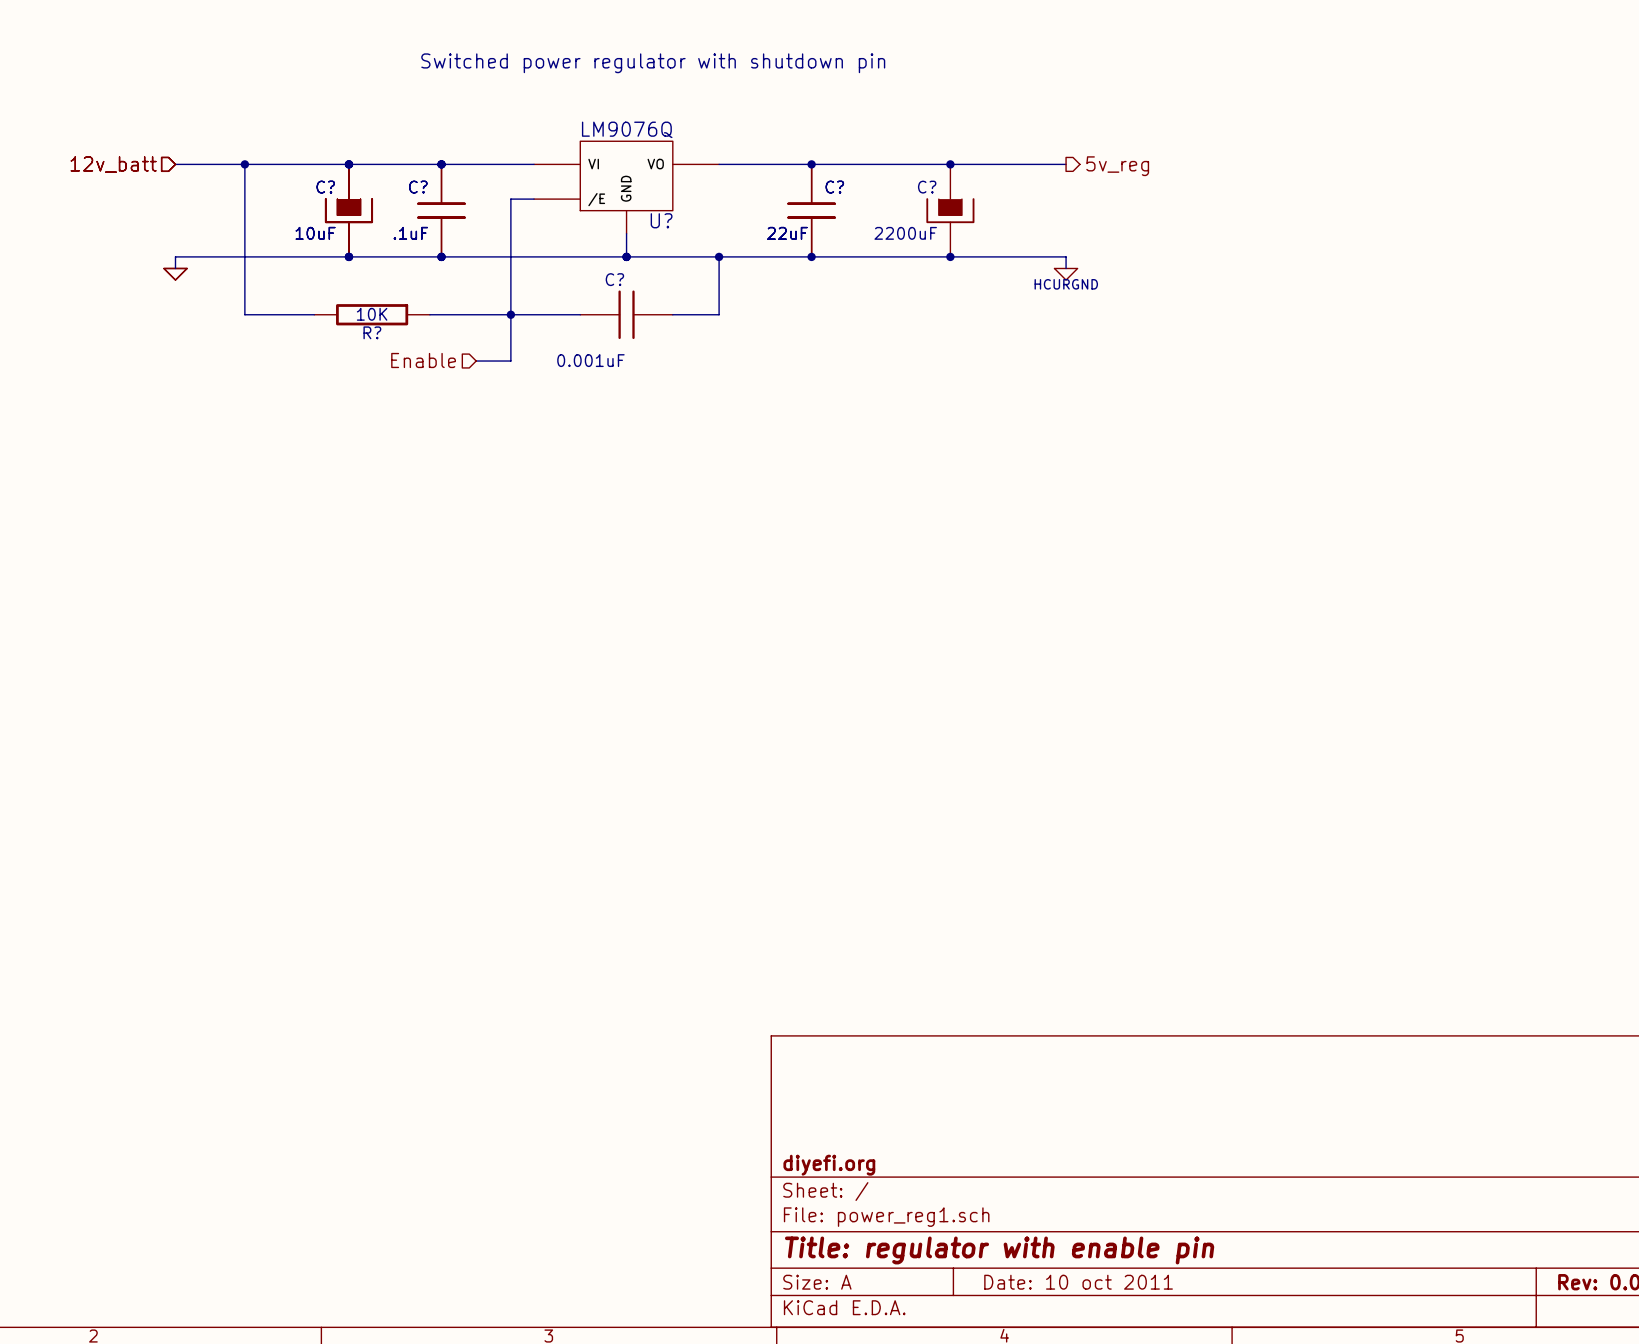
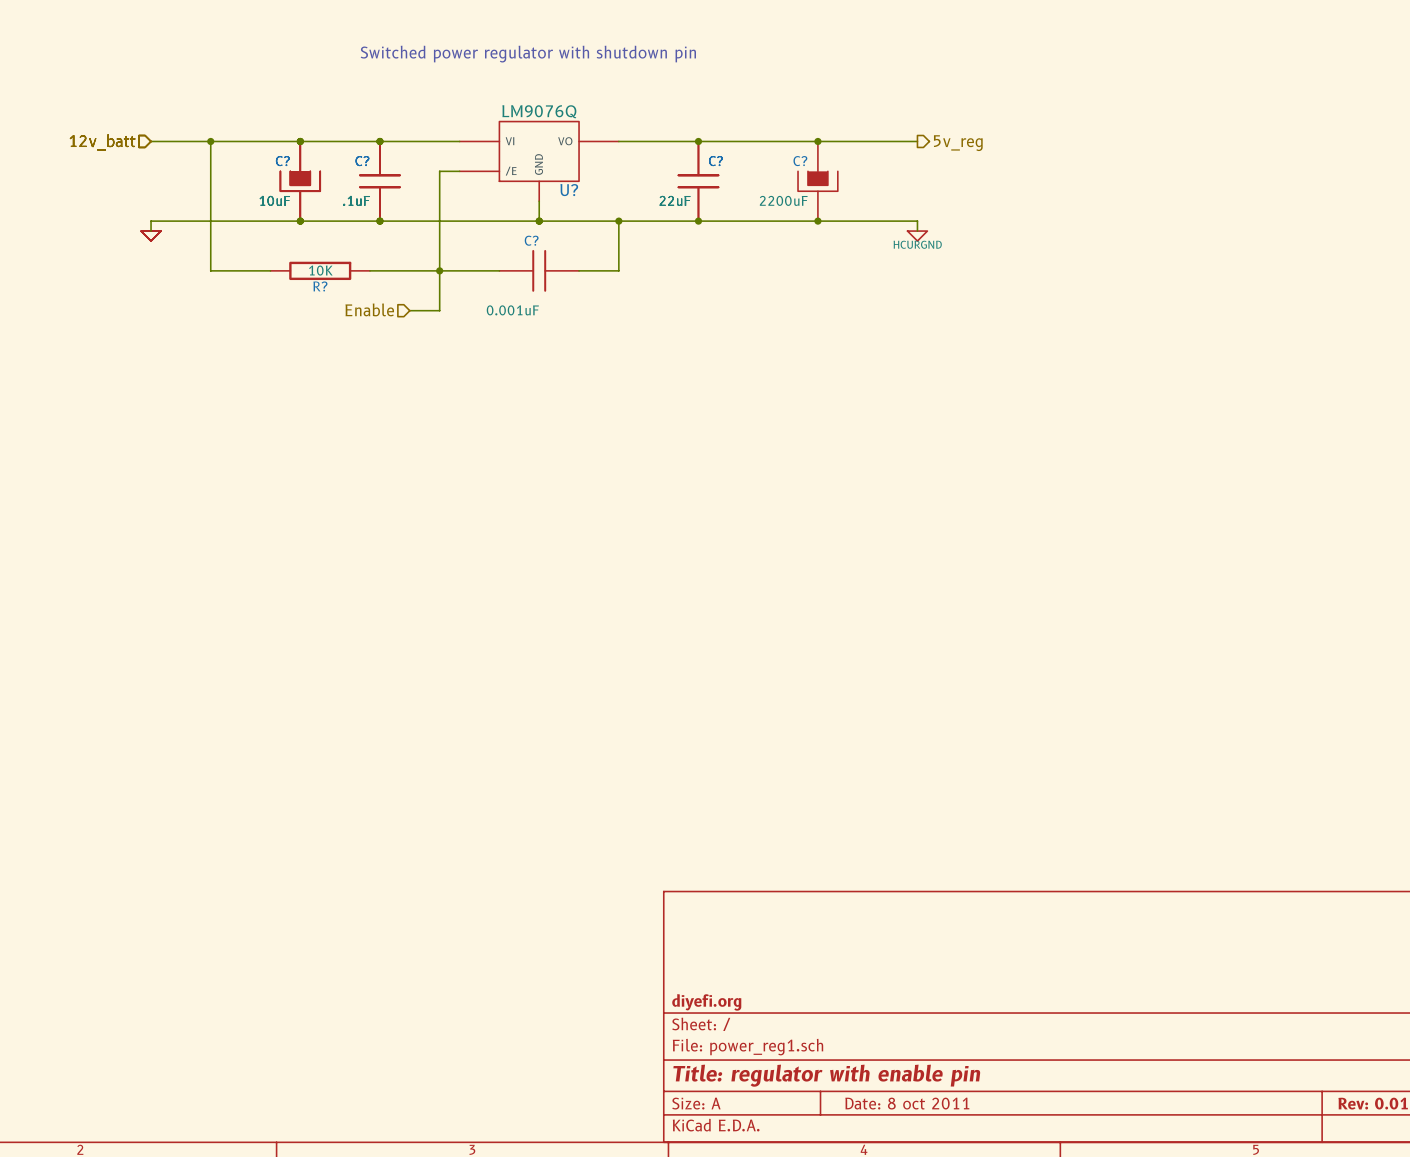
title block: Date: 10 oct 2011 (1078, 1282) -> Date: 8 oct 2011 (907, 1103)

